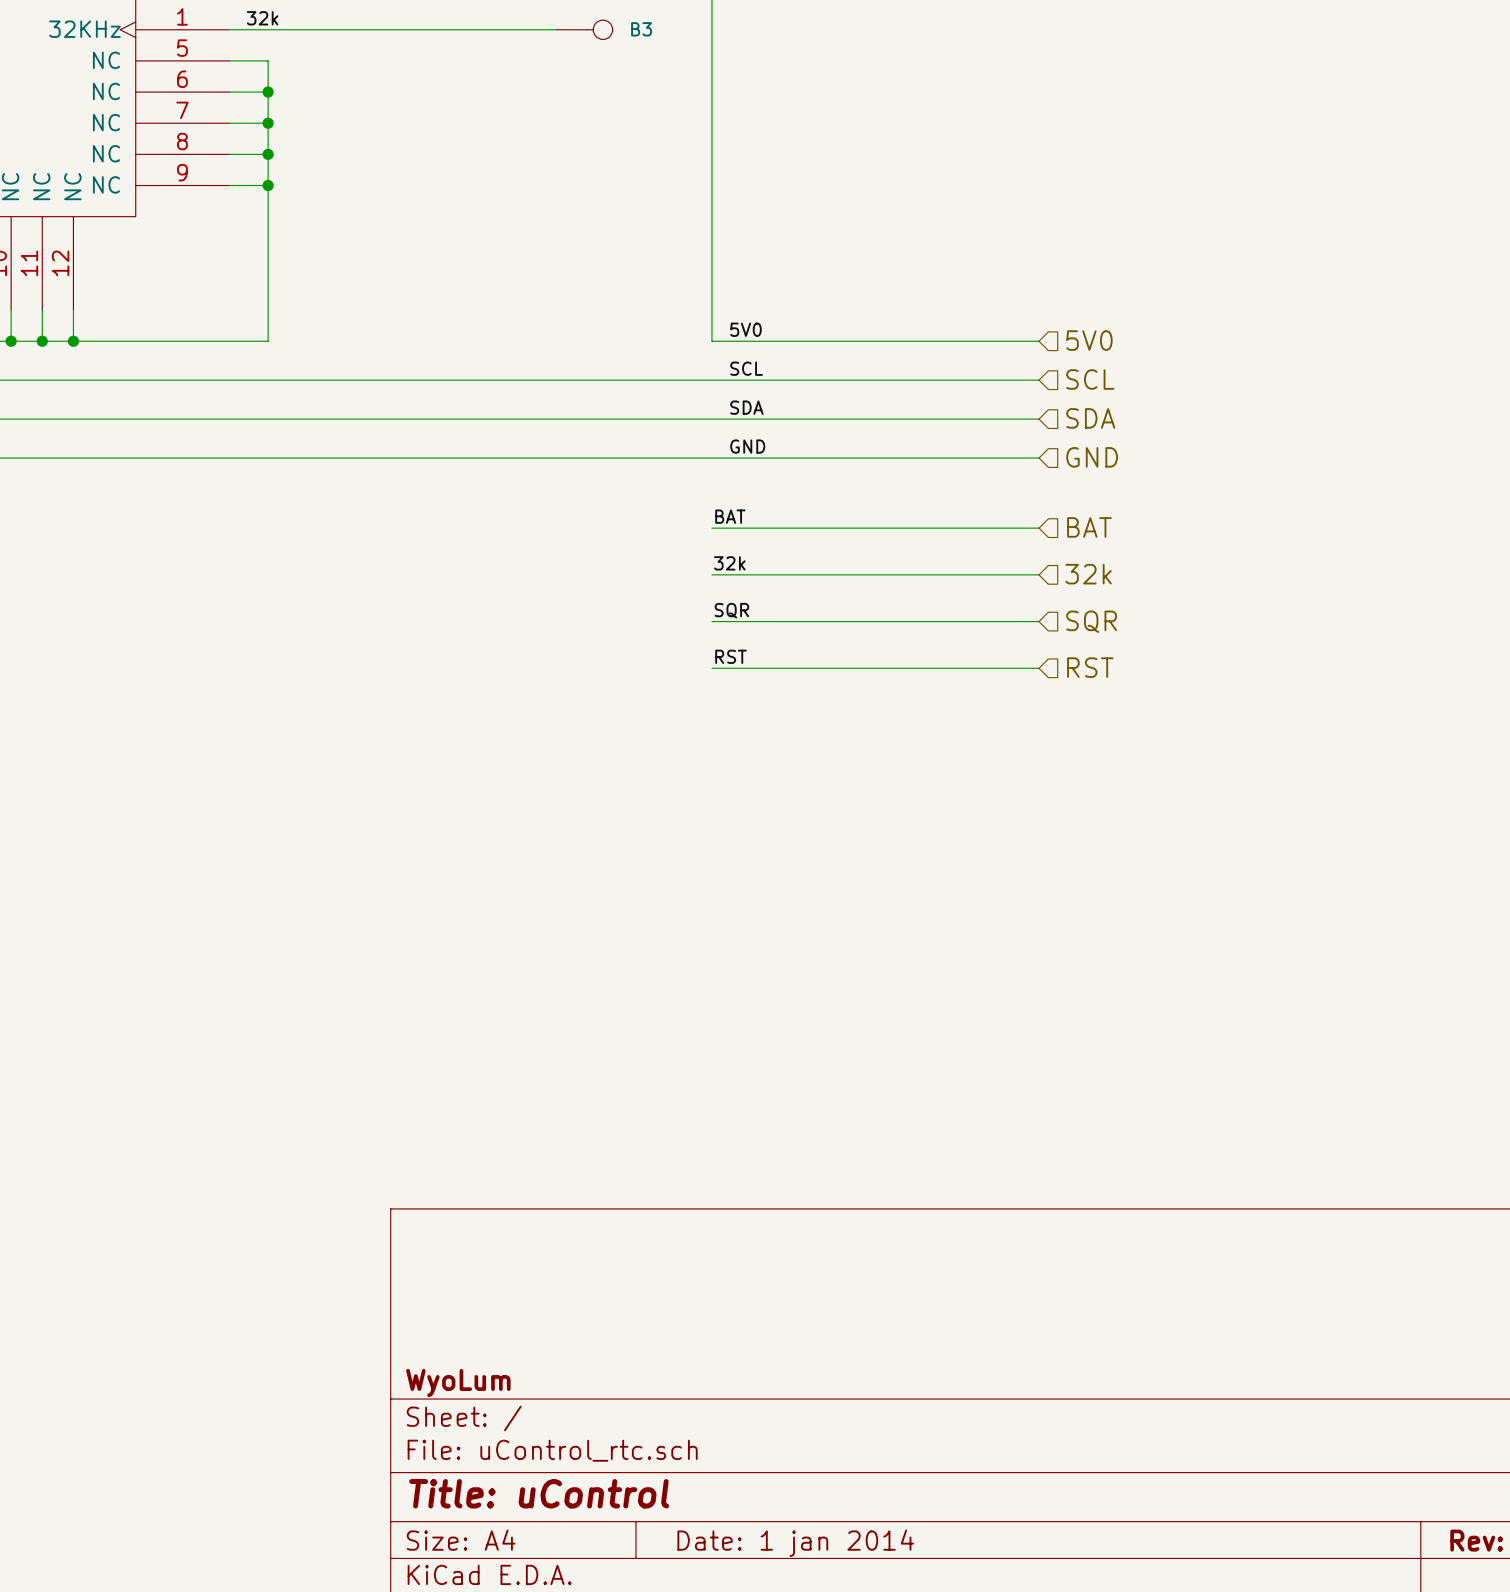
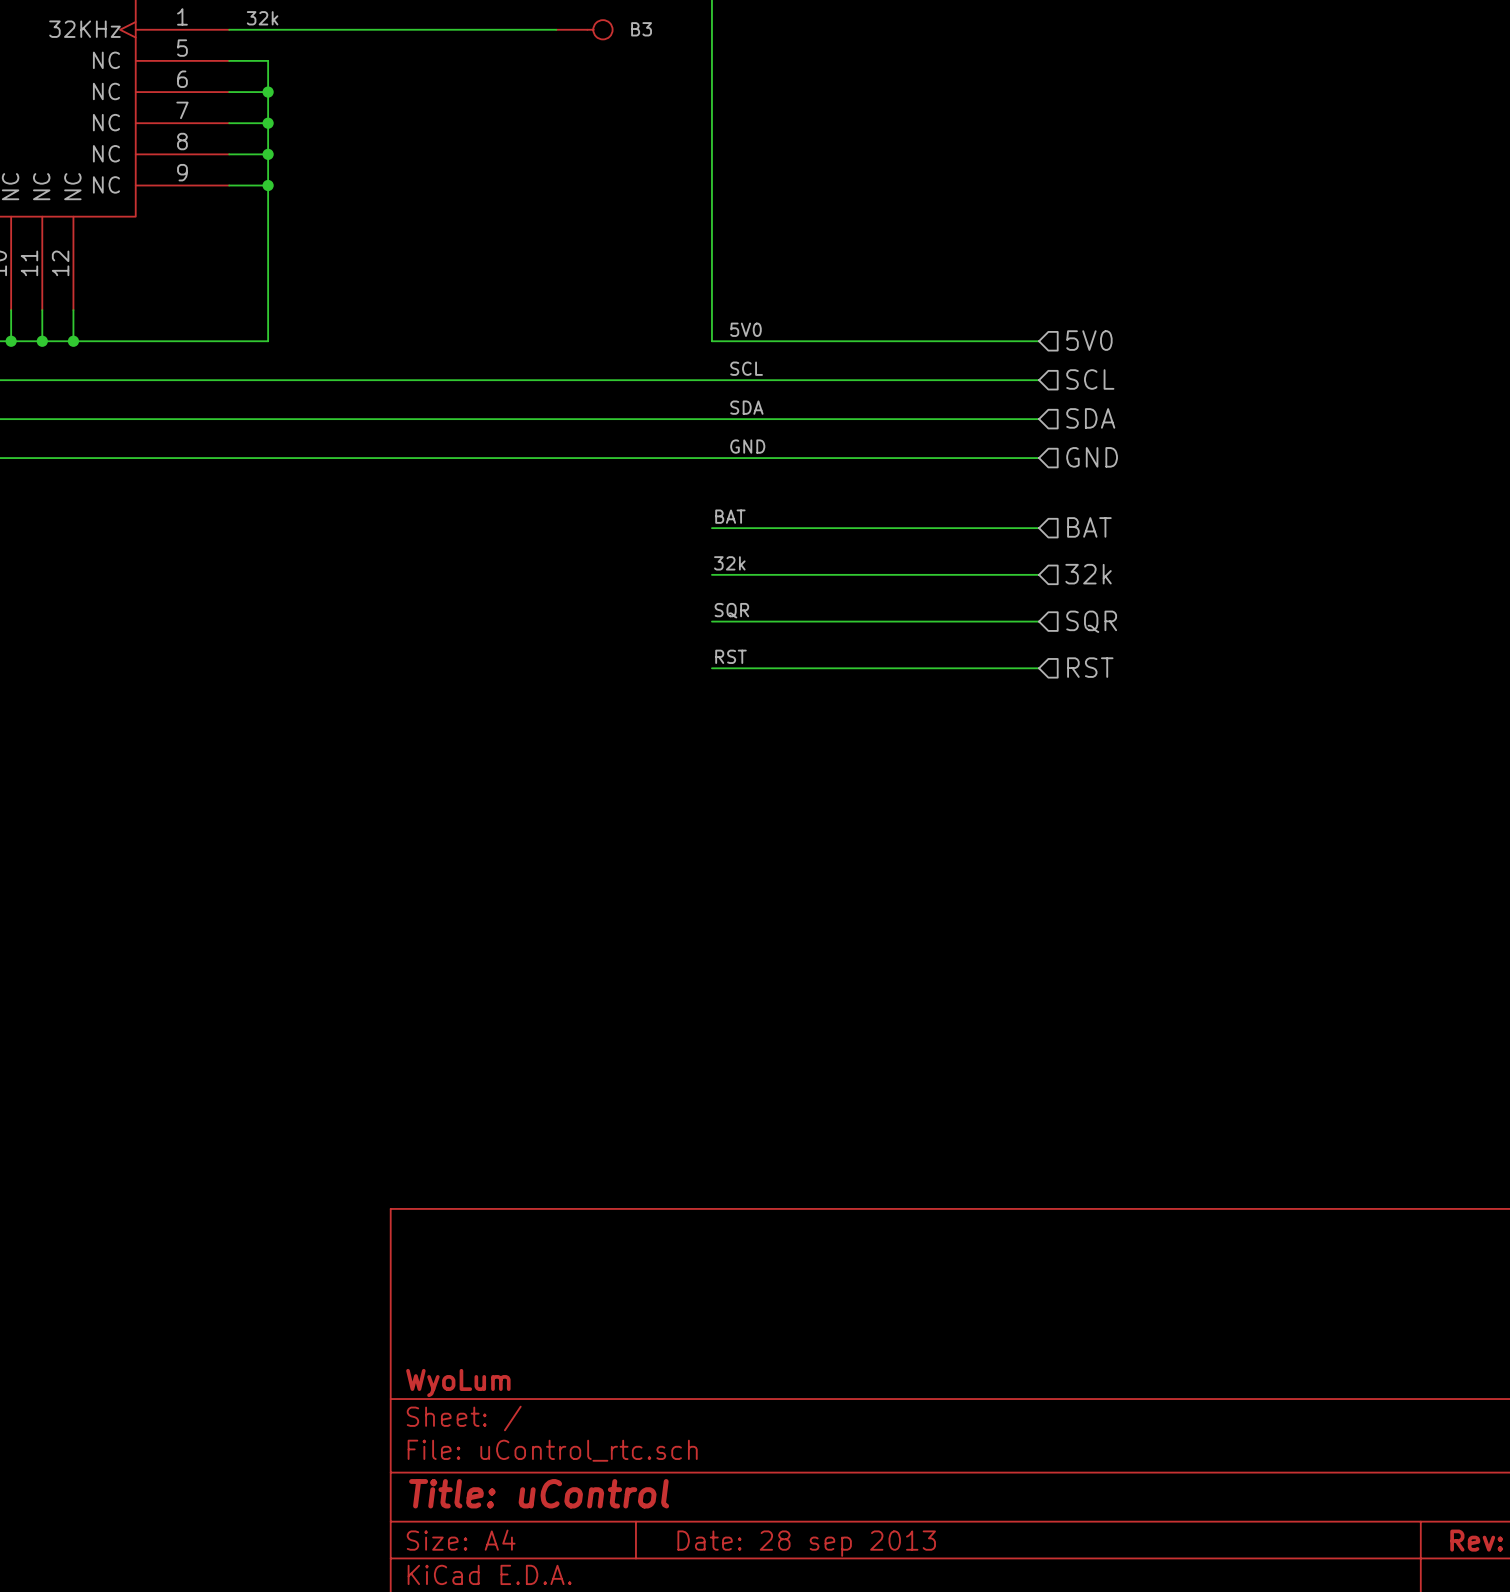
title block: Date: 1 jan 2014 (795, 1543) -> Date: 28 sep 2013 (806, 1543)

